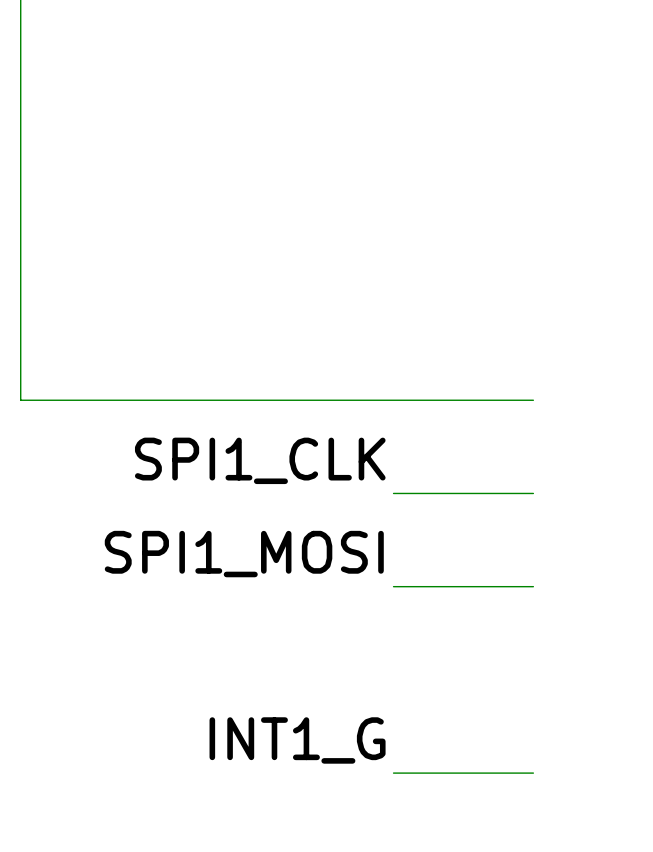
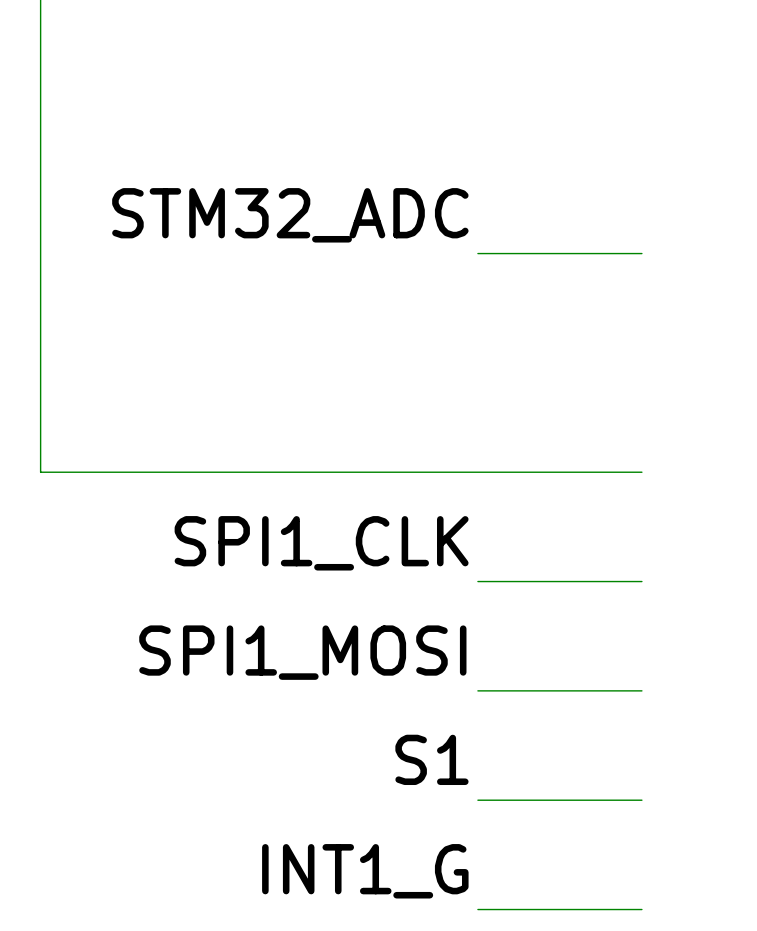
label: none -> STM32_ADC (290, 215)
wire: none -> (477, 253) (641, 253)
label: none -> S1 (431, 759)
wire: none -> (477, 800) (641, 800)

